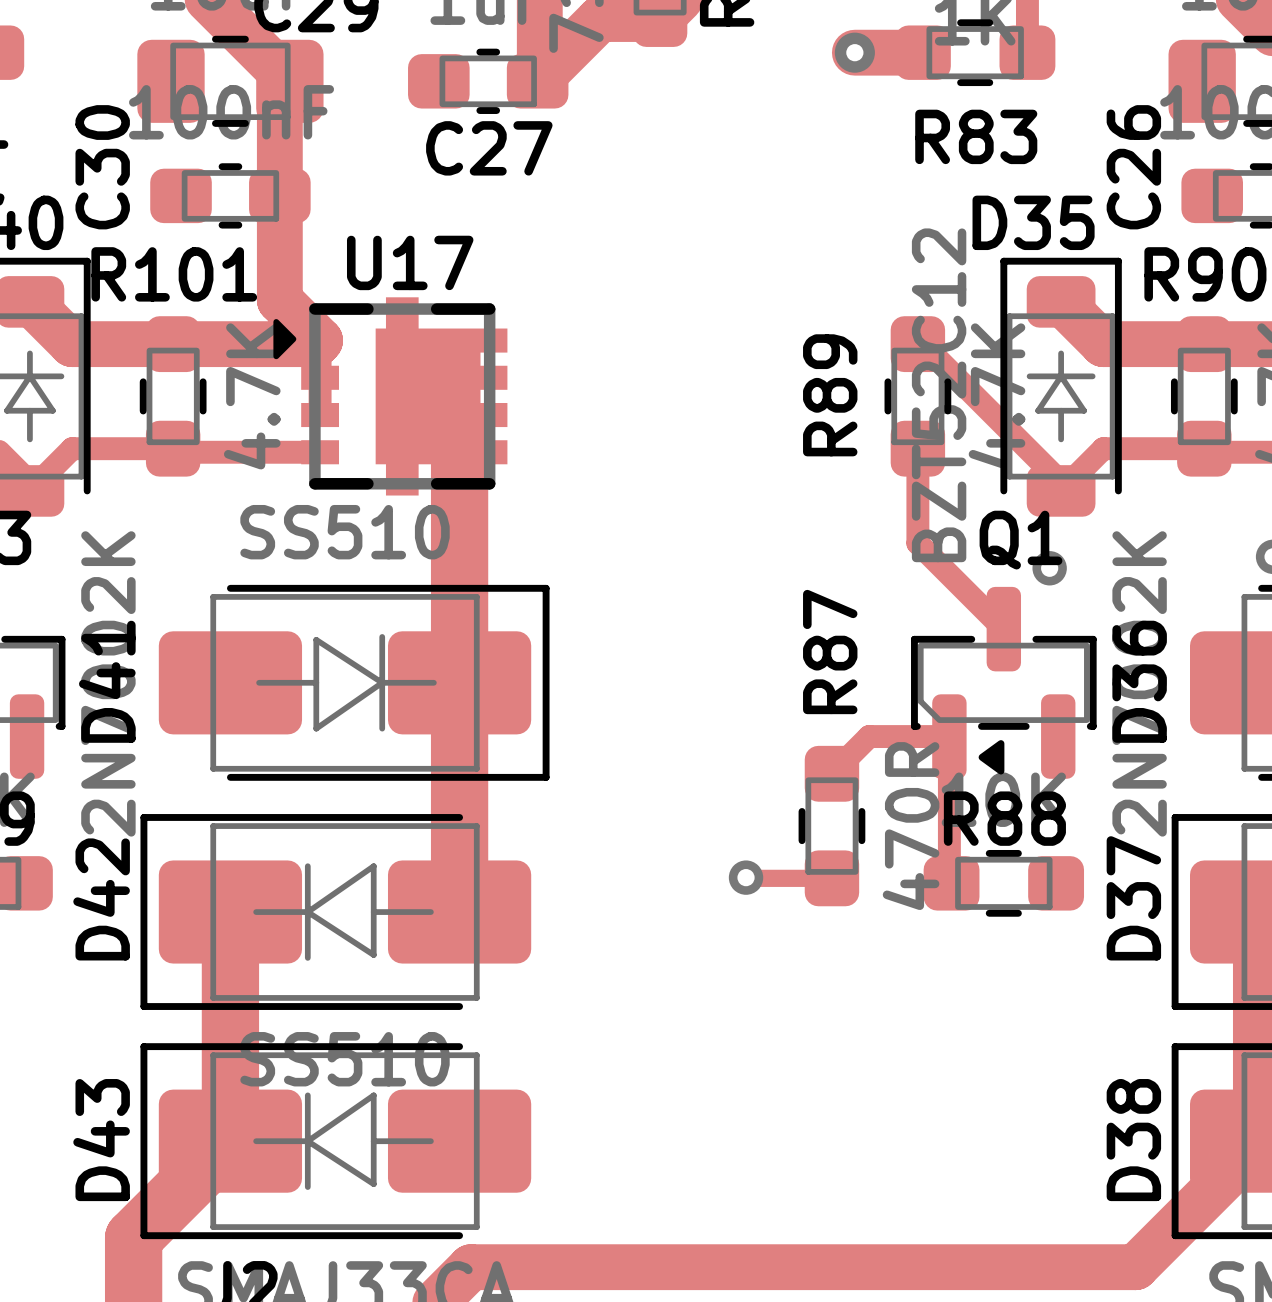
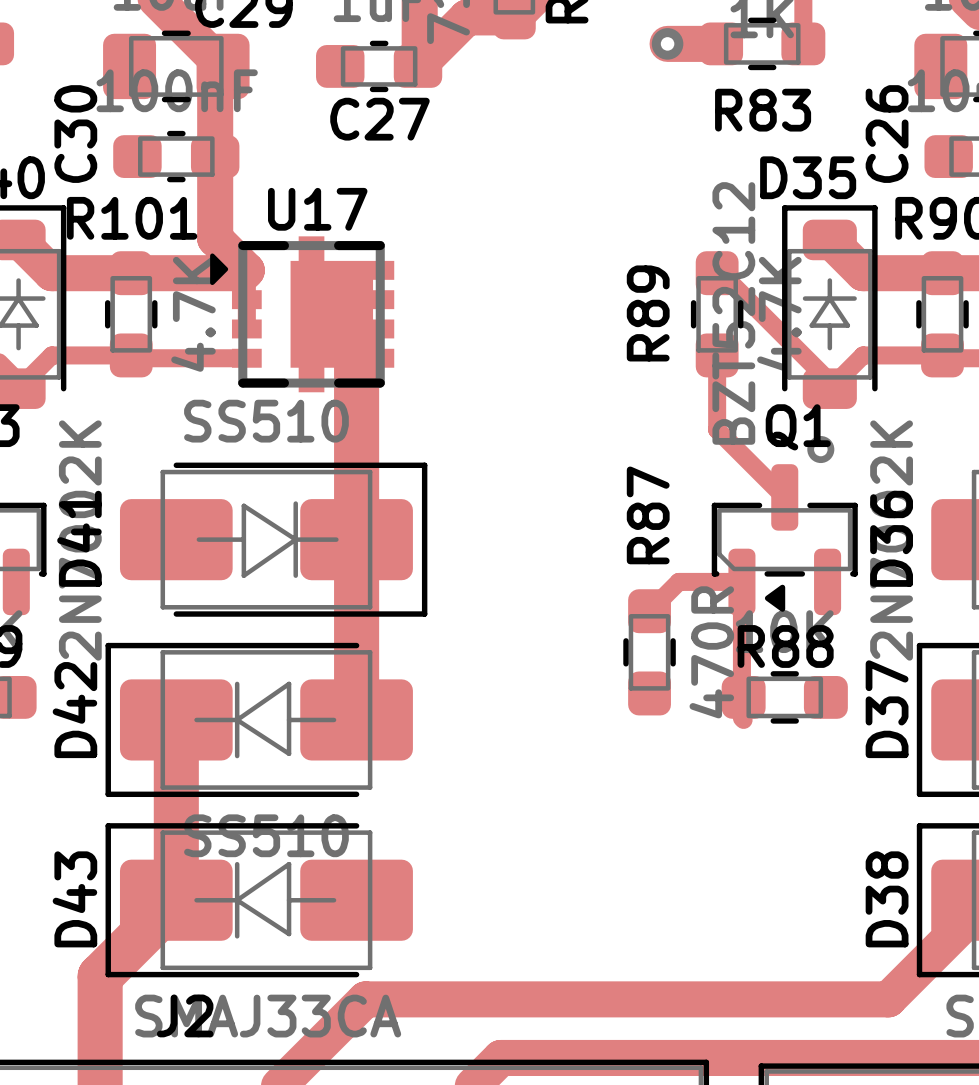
via: (746, 877) -> none
track: (746, 878) (831, 878) -> none
track: none -> (741, 718) (743, 719)

